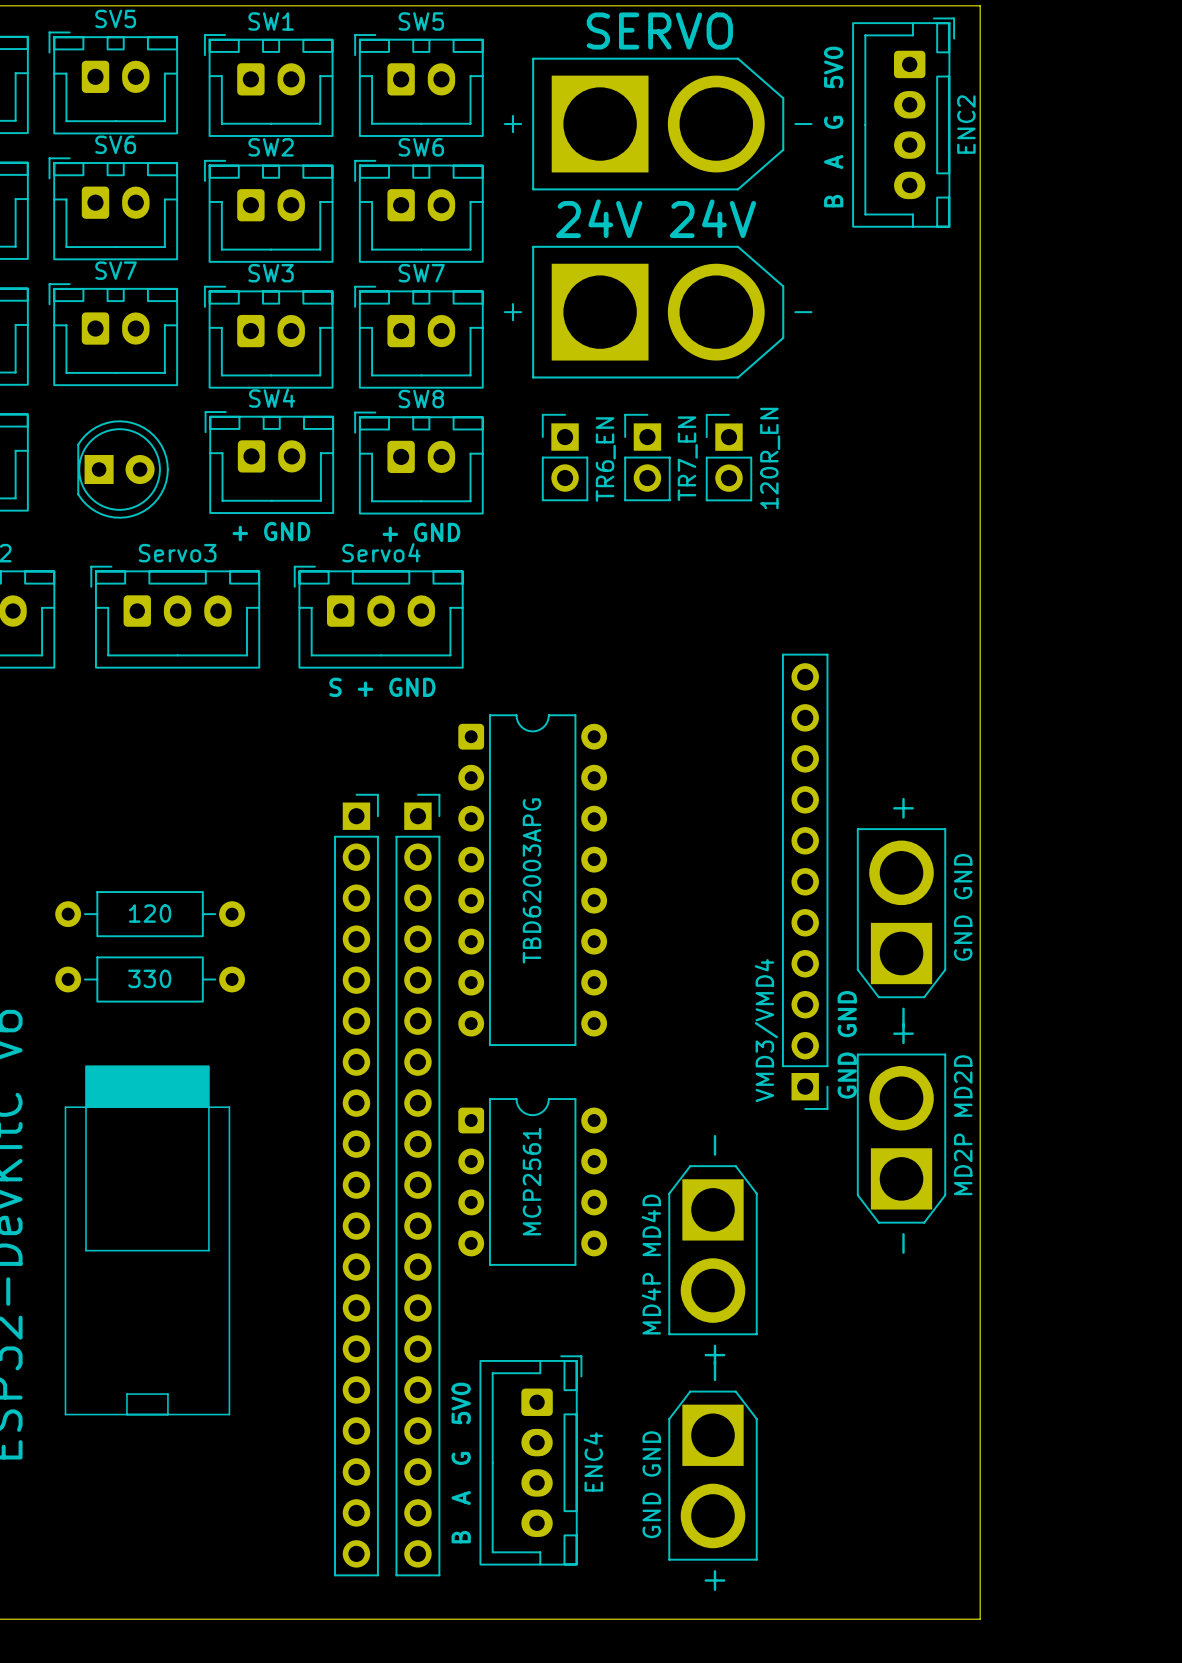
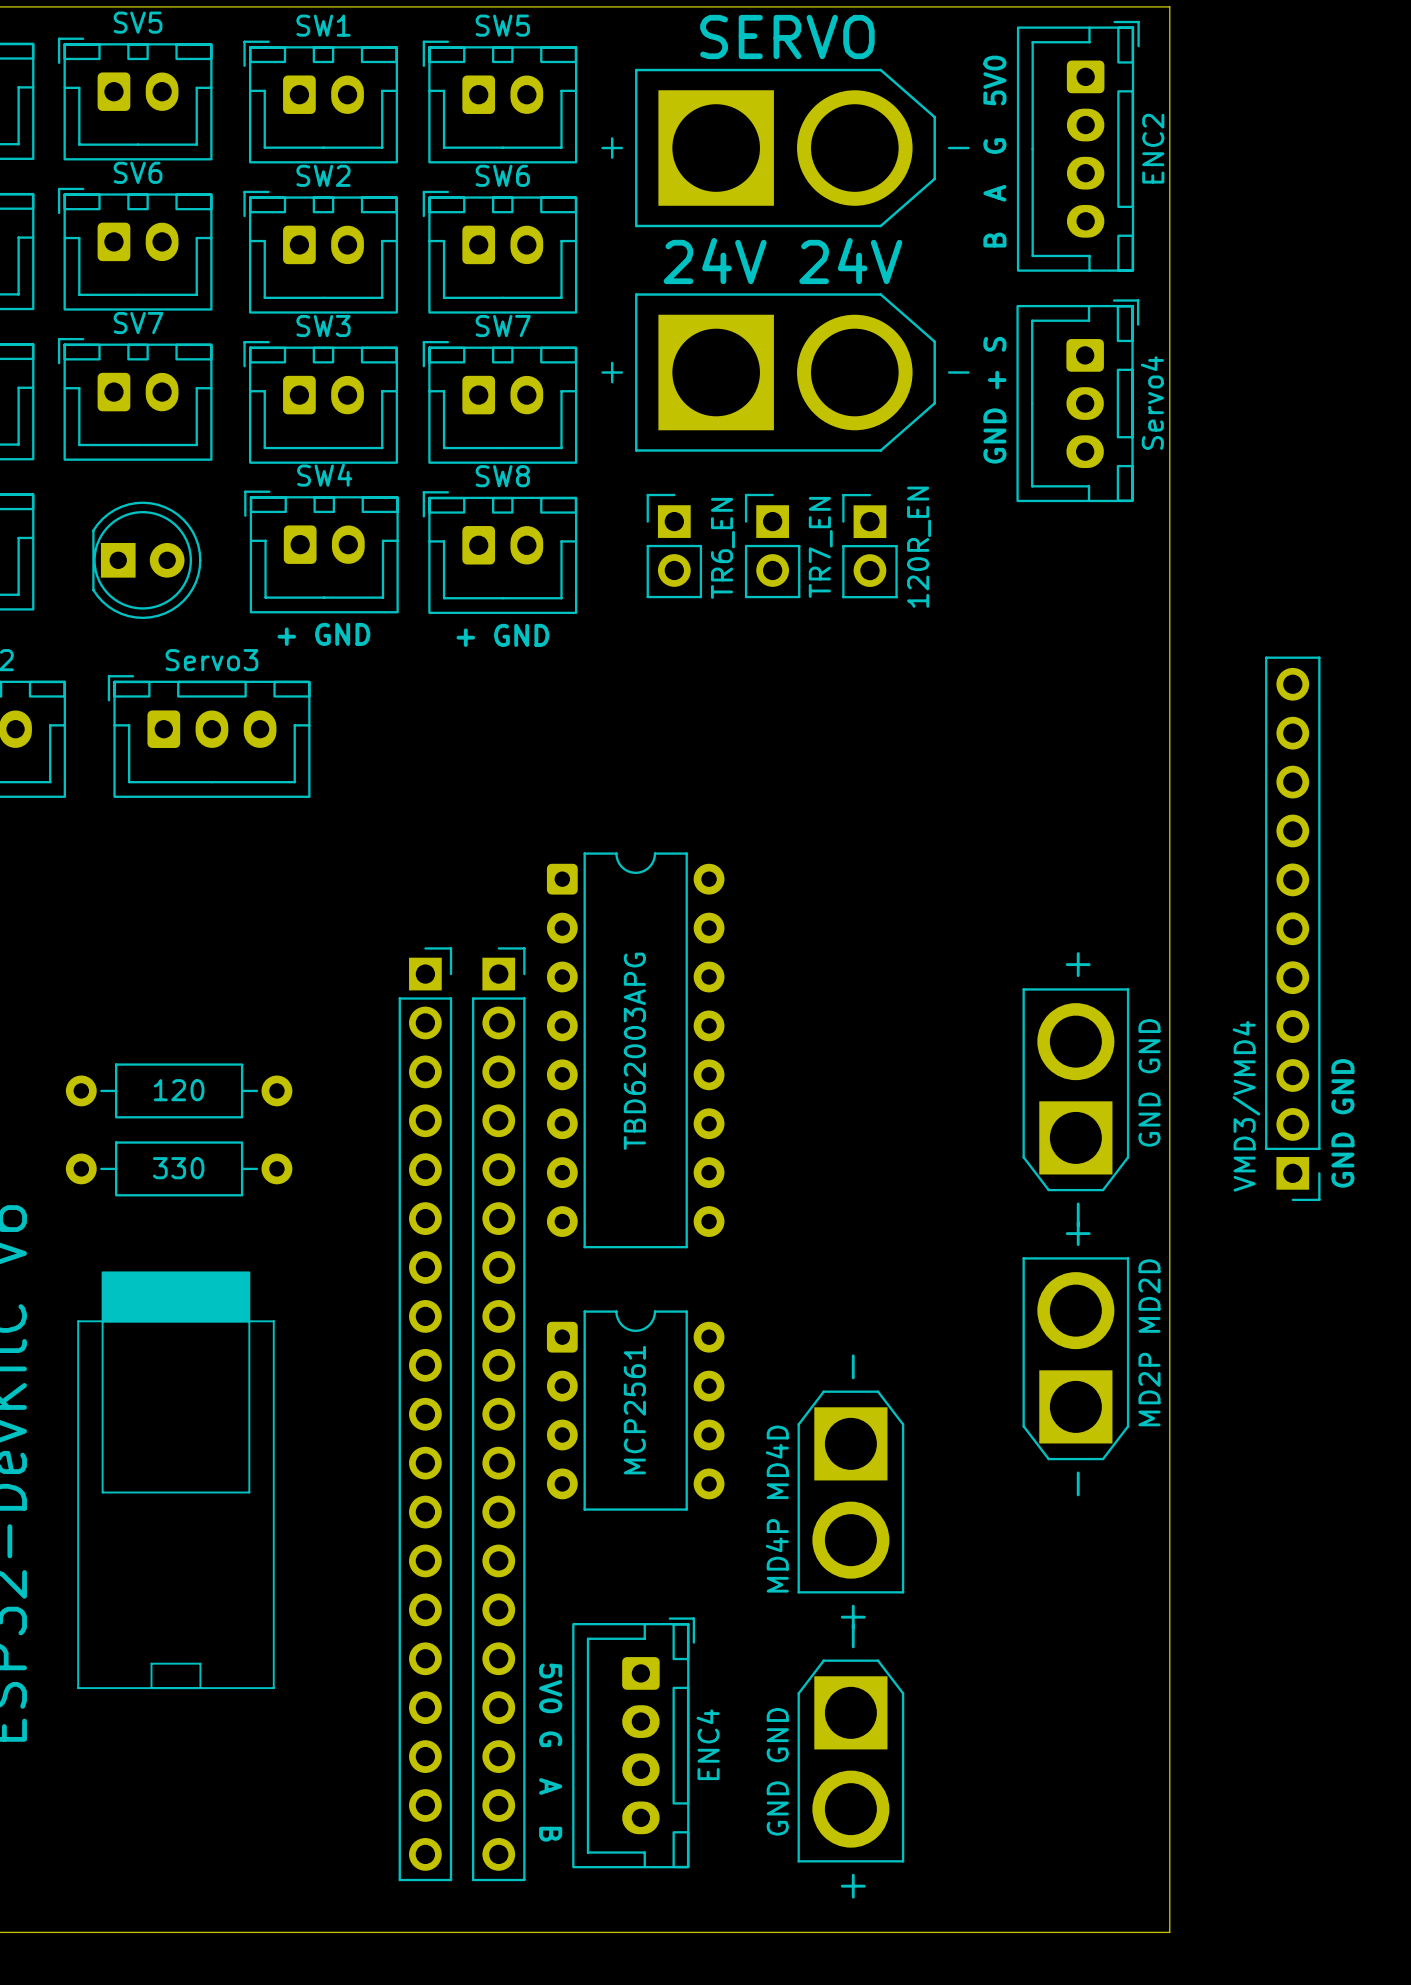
text: none -> GND + S (994, 400)
Servo4 rotation: 0° (378, 617) -> 90° clockwise (1077, 400)
Servo4 position: (378, 617) -> (1077, 400)
text: S + GND (382, 687) -> none
VMD3/VMD4 position: (805, 881) -> (1292, 928)
text position: GND GND (847, 1044) -> GND GND (1342, 1123)
text: B A G 5V0 (461, 1463) -> none
text: none -> 5V0 G A B (550, 1752)

